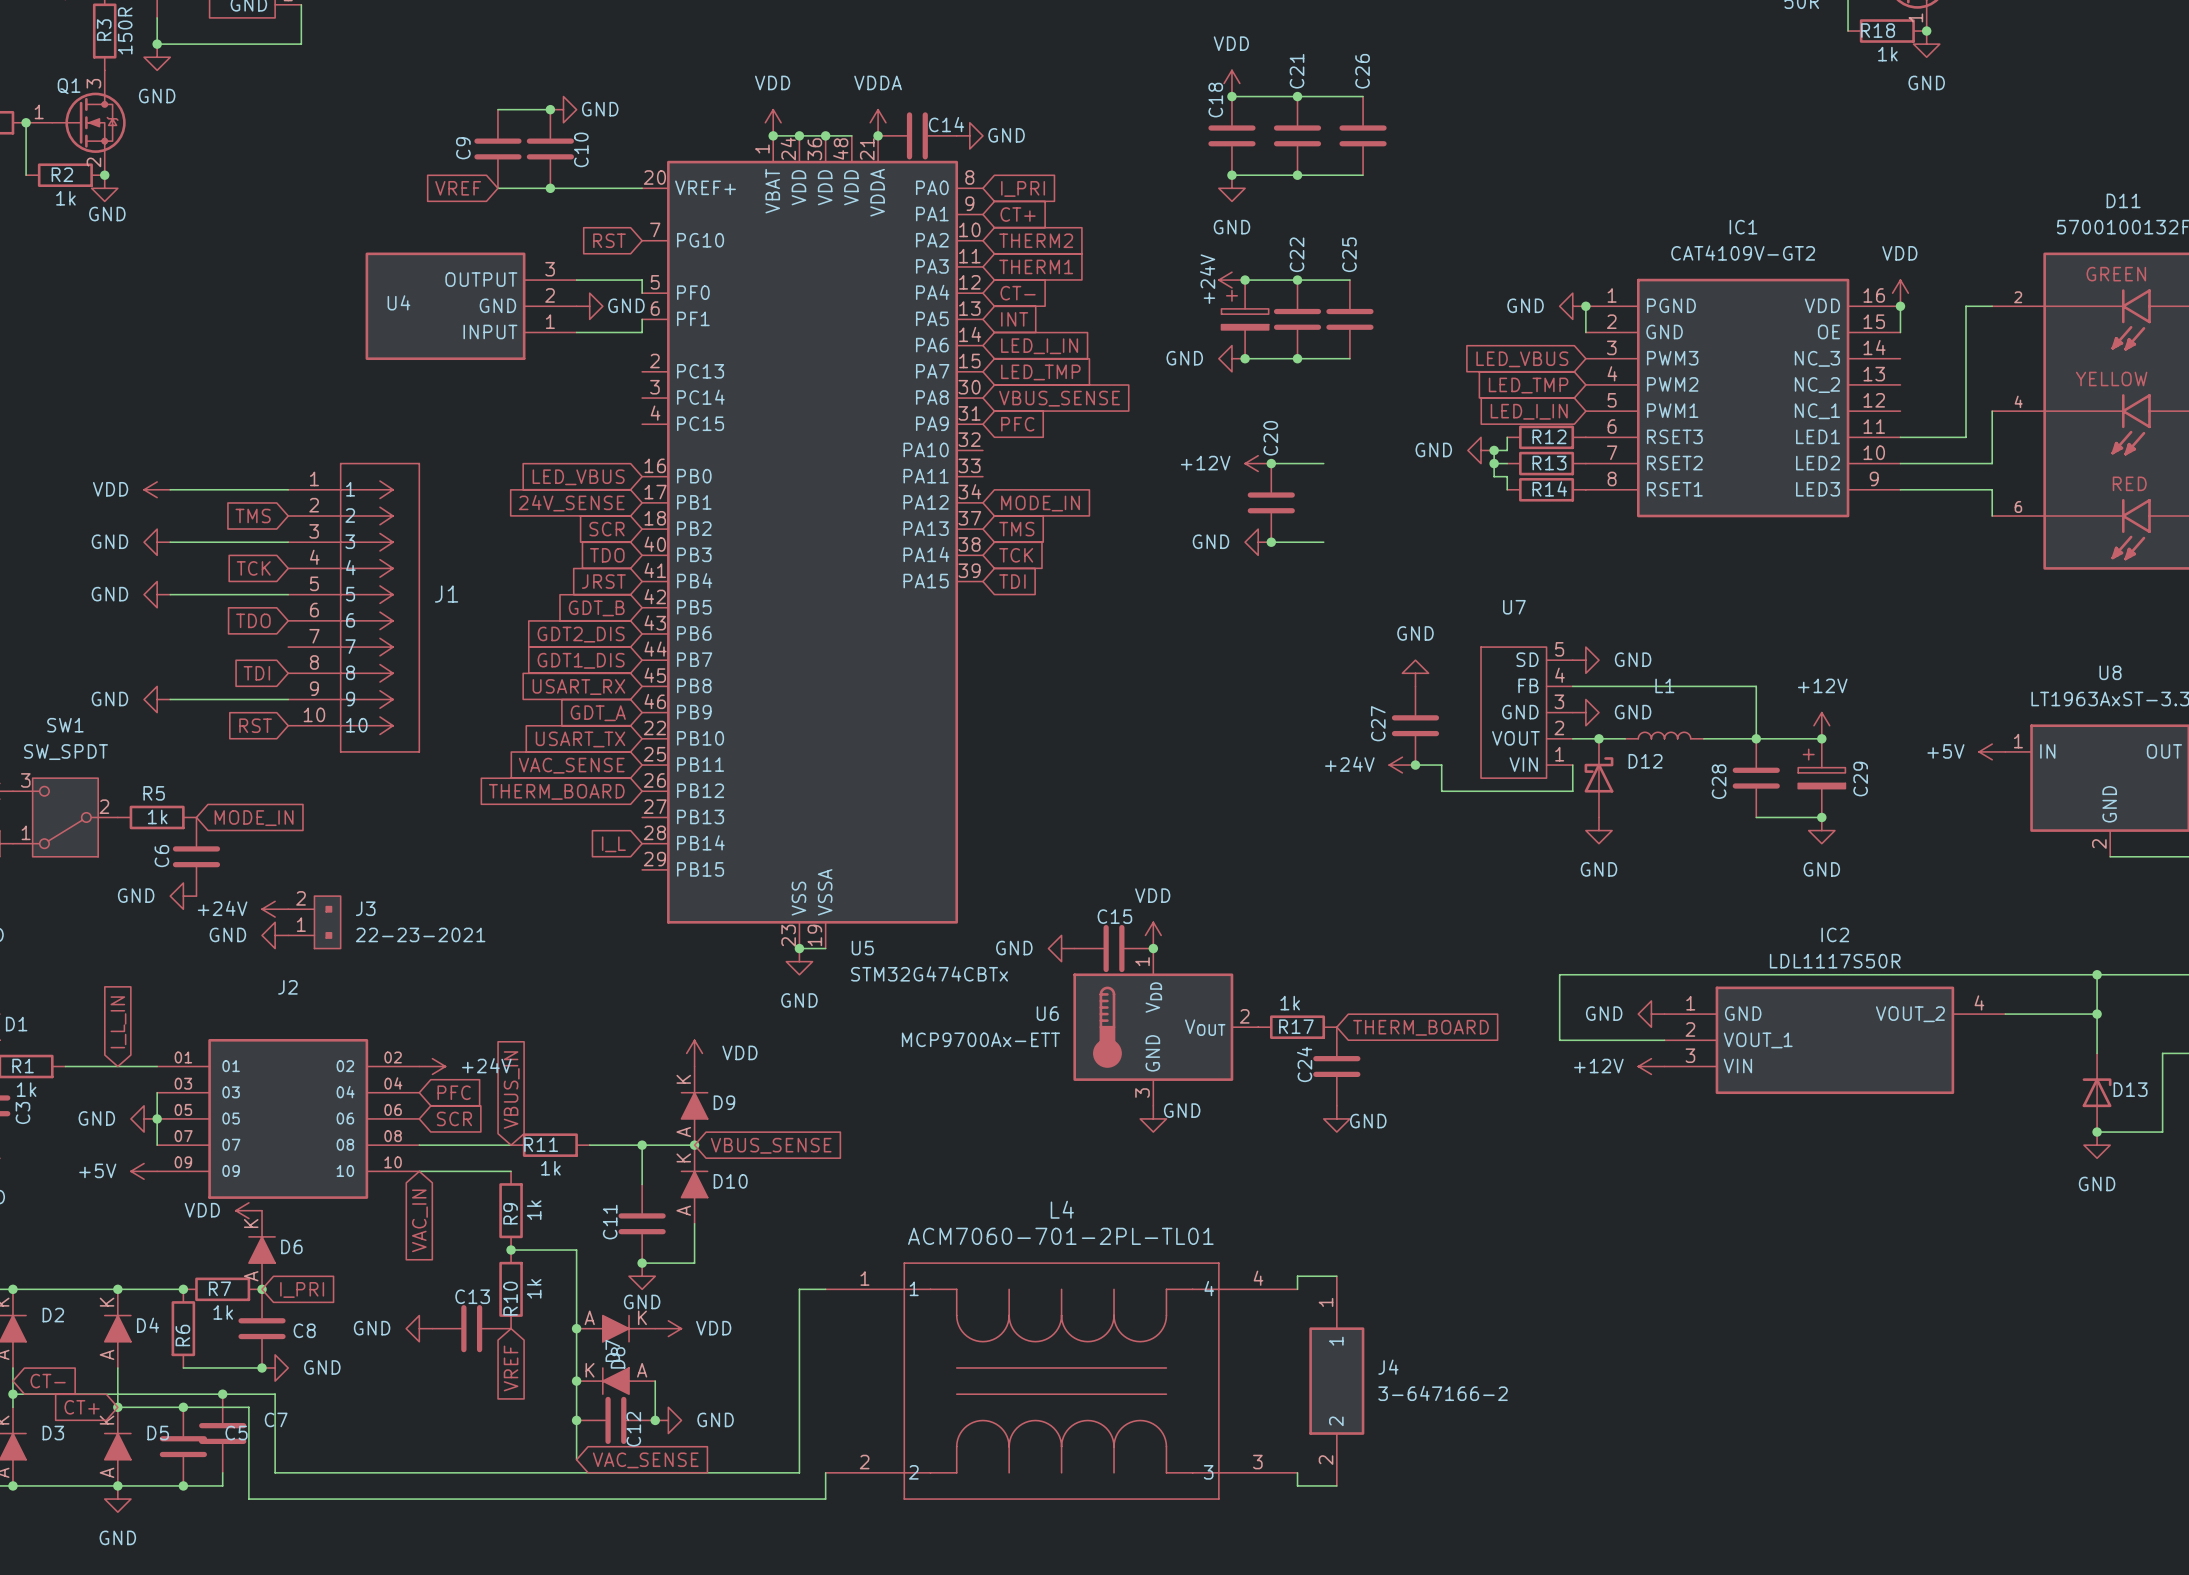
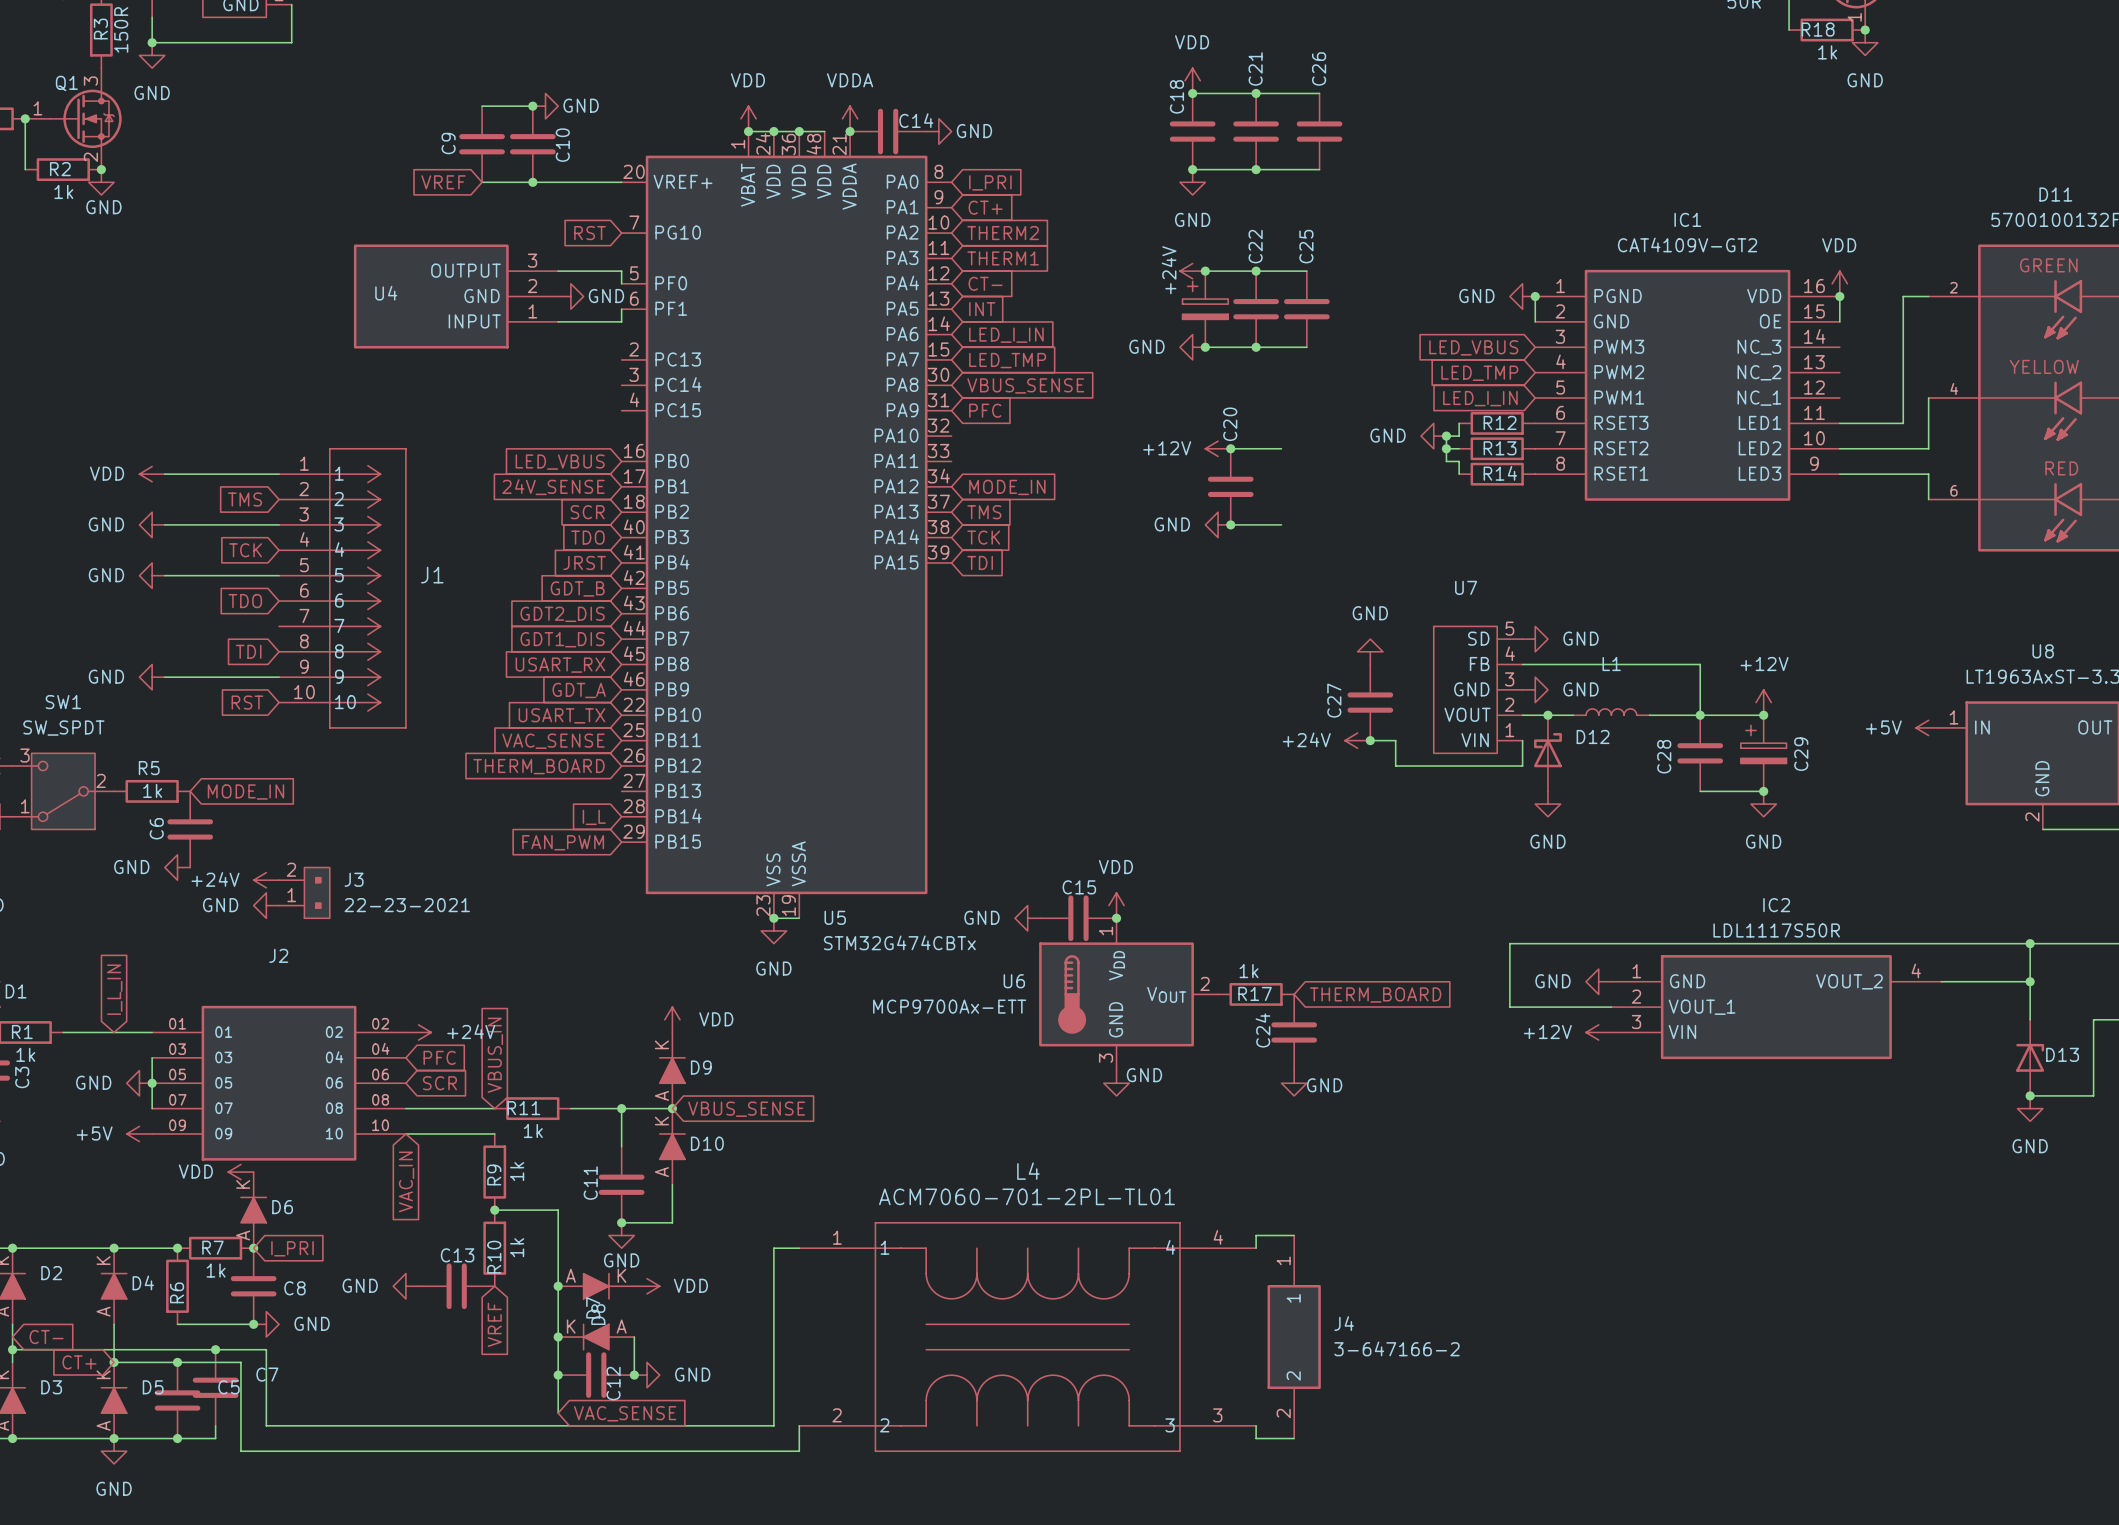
global label: none -> FAN_PWM (563, 842)

